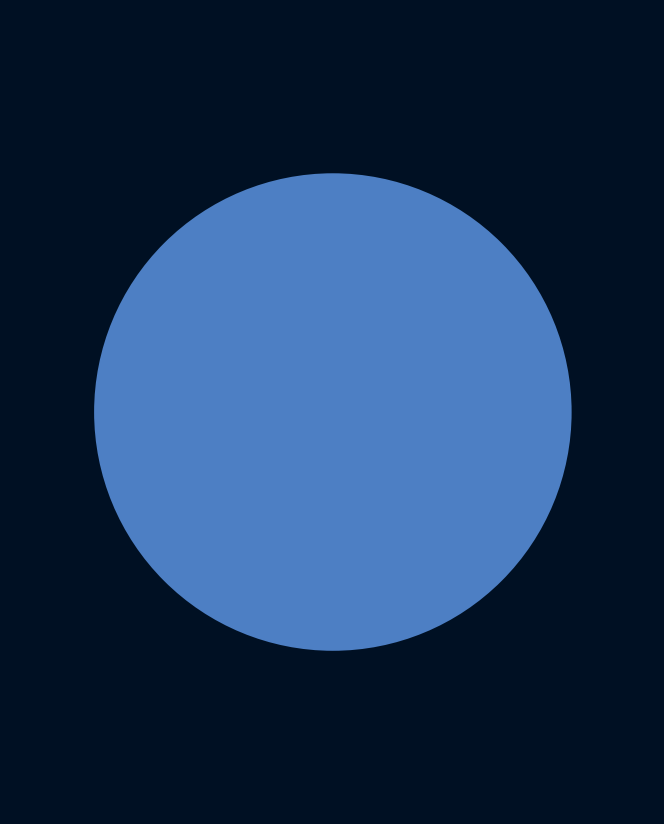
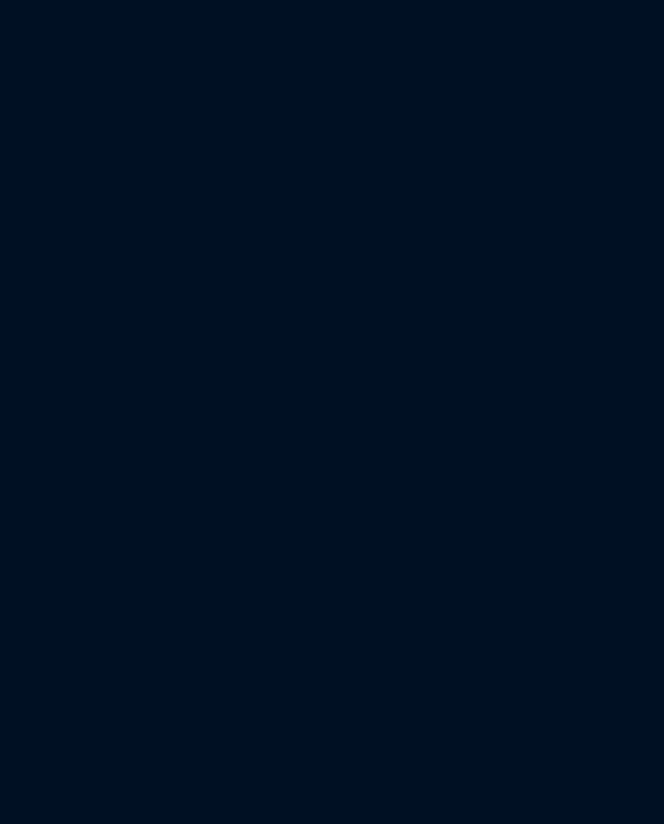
part: (332, 412) -> none

